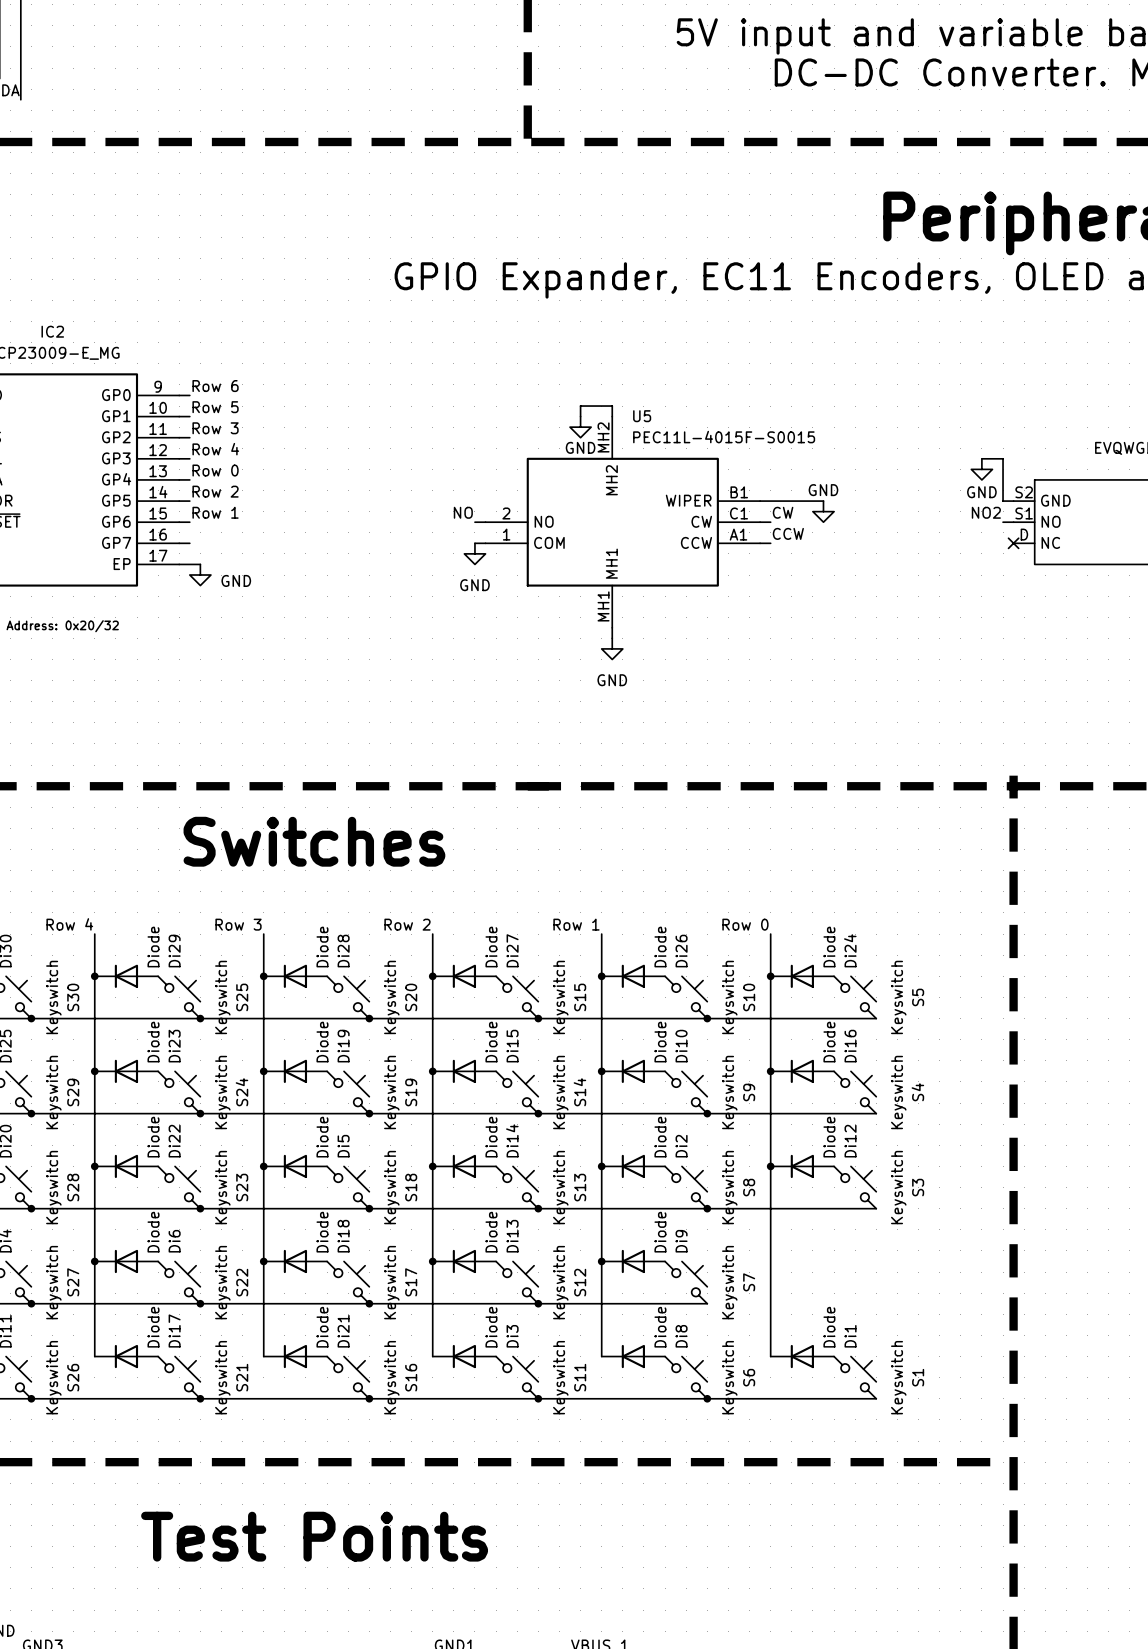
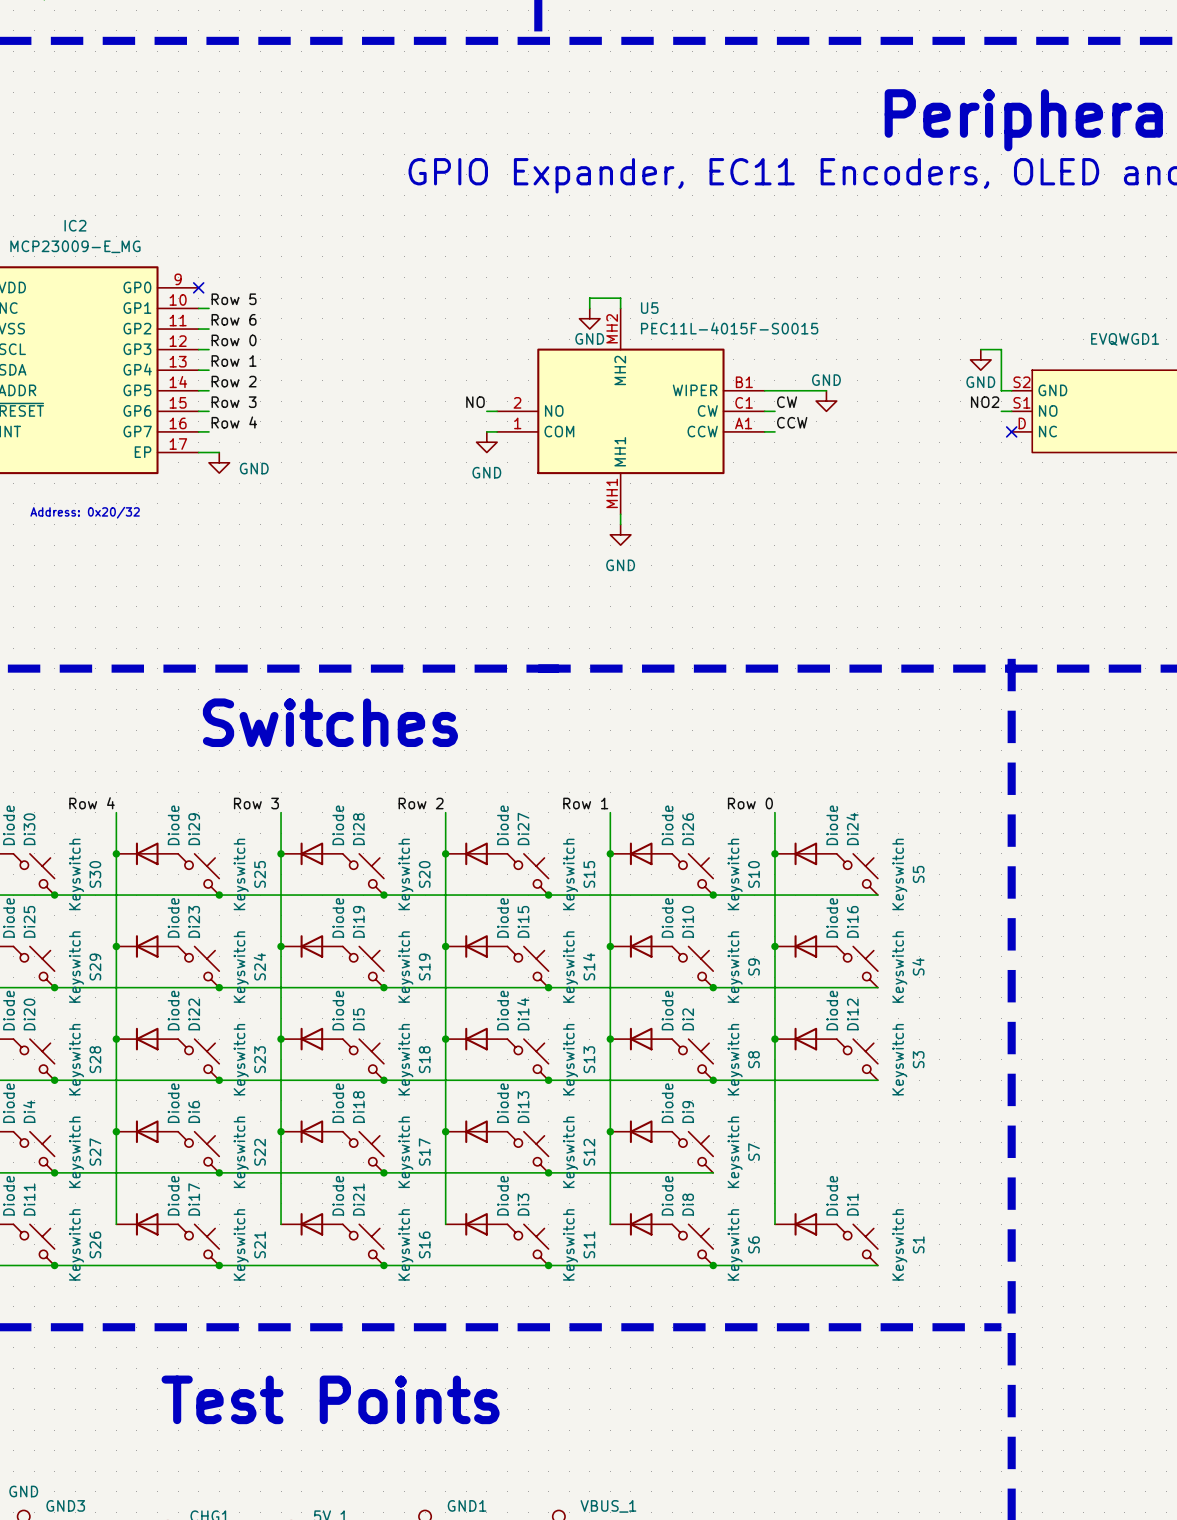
label: Row 6 (215, 386) -> none
wire: (179, 395) (189, 395) -> none
no-connect mark: none -> (198, 287)
label: Row 3 (215, 428) -> Row 6 (234, 319)
label: Row 4 (215, 449) -> Row 0 (234, 340)
label: Row 0 (215, 470) -> Row 1 (234, 361)
label: Row 1 (215, 512) -> Row 3 (234, 402)
label: none -> Row 4 (234, 422)

